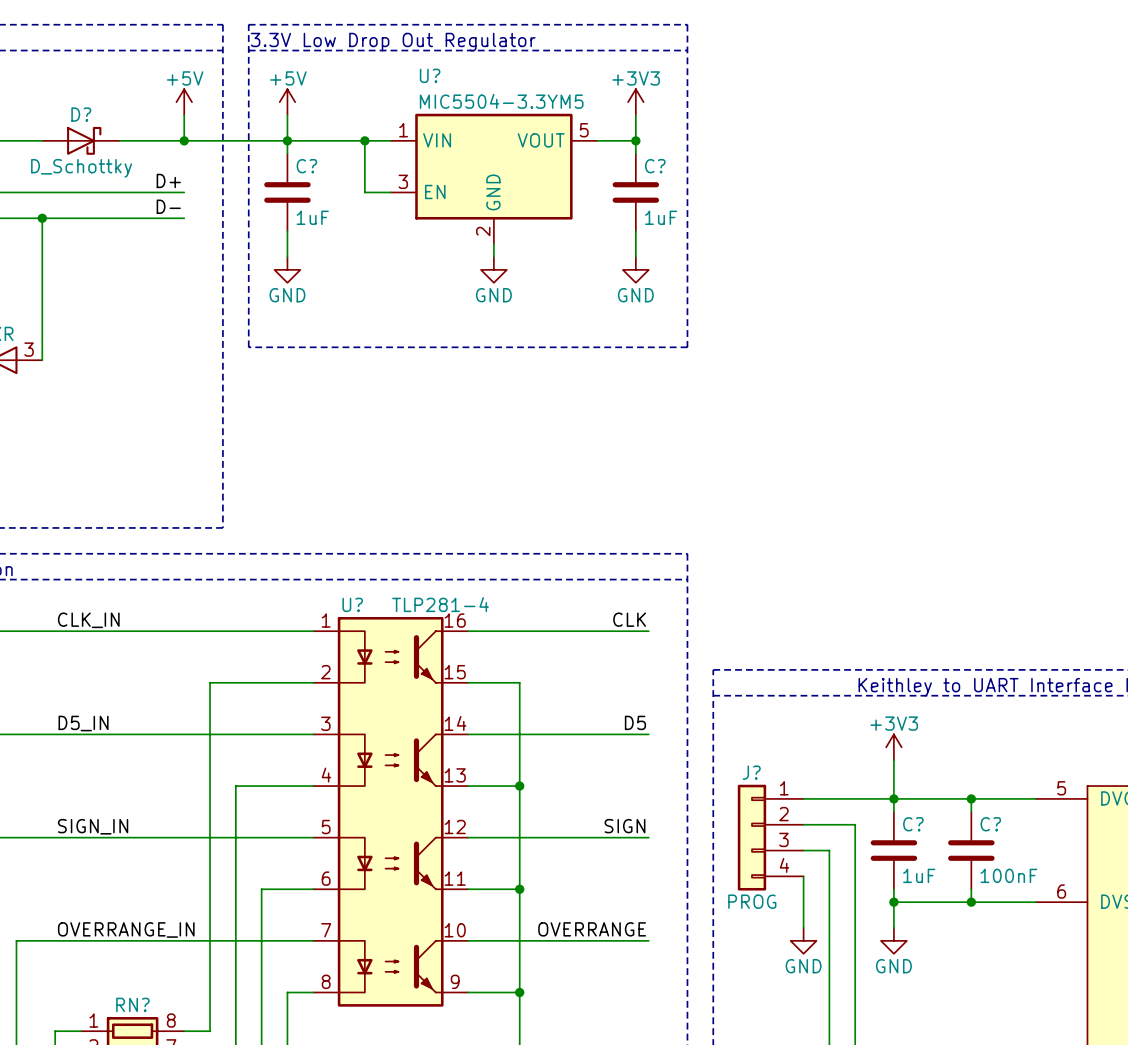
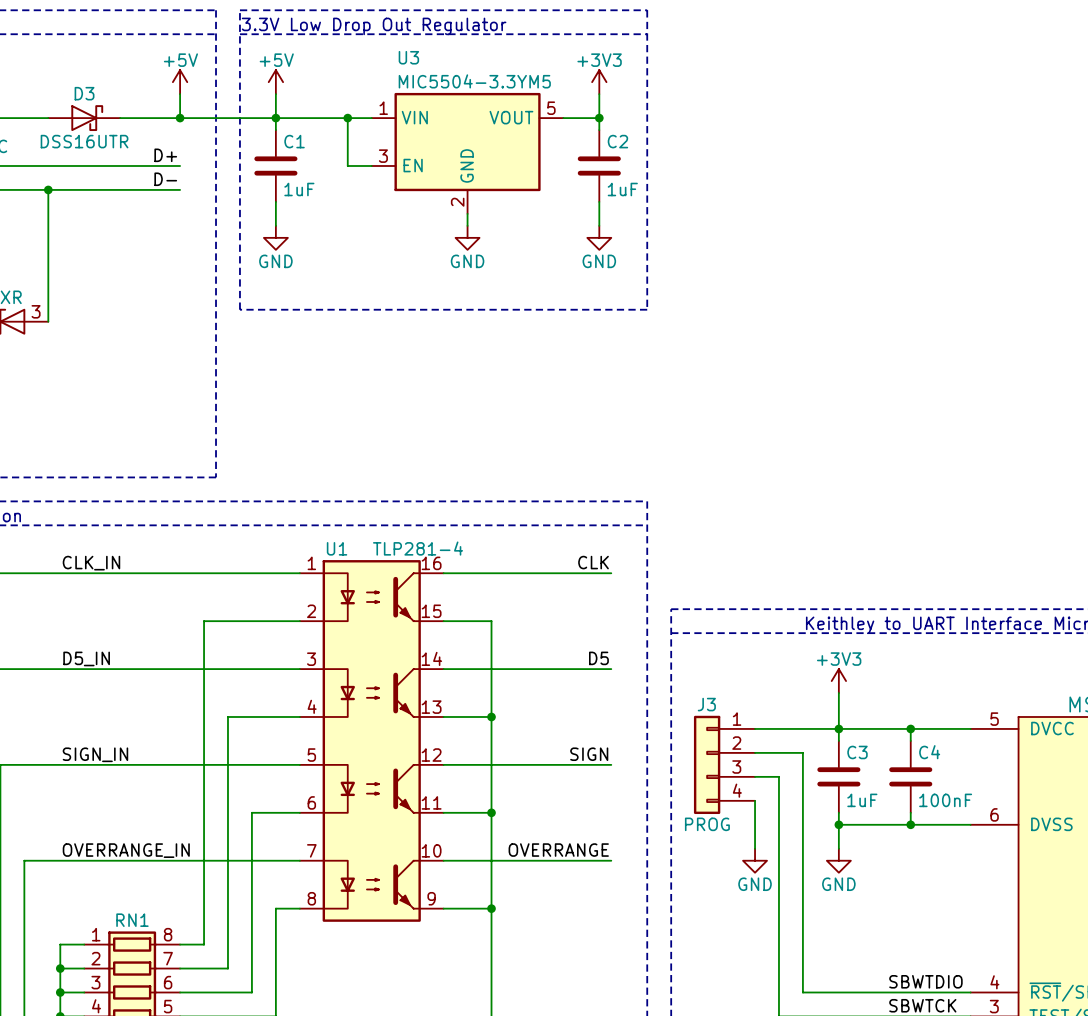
U? name: U? (430, 75) -> U3 (408, 57)
D? name: D? (81, 114) -> D3 (84, 93)
C? name: C? (306, 166) -> C1 (294, 141)
C? name: C? (655, 166) -> C2 (617, 141)
D? value: D_Schottky (81, 168) -> DSS16UTR (84, 141)
U? name: U? (352, 604) -> U1 (337, 548)
J? name: J? (751, 772) -> J3 (706, 704)
C? name: C? (913, 824) -> C3 (857, 752)
C? name: C? (990, 824) -> C4 (929, 752)
RN? name: RN? (132, 1004) -> RN1 (132, 920)

